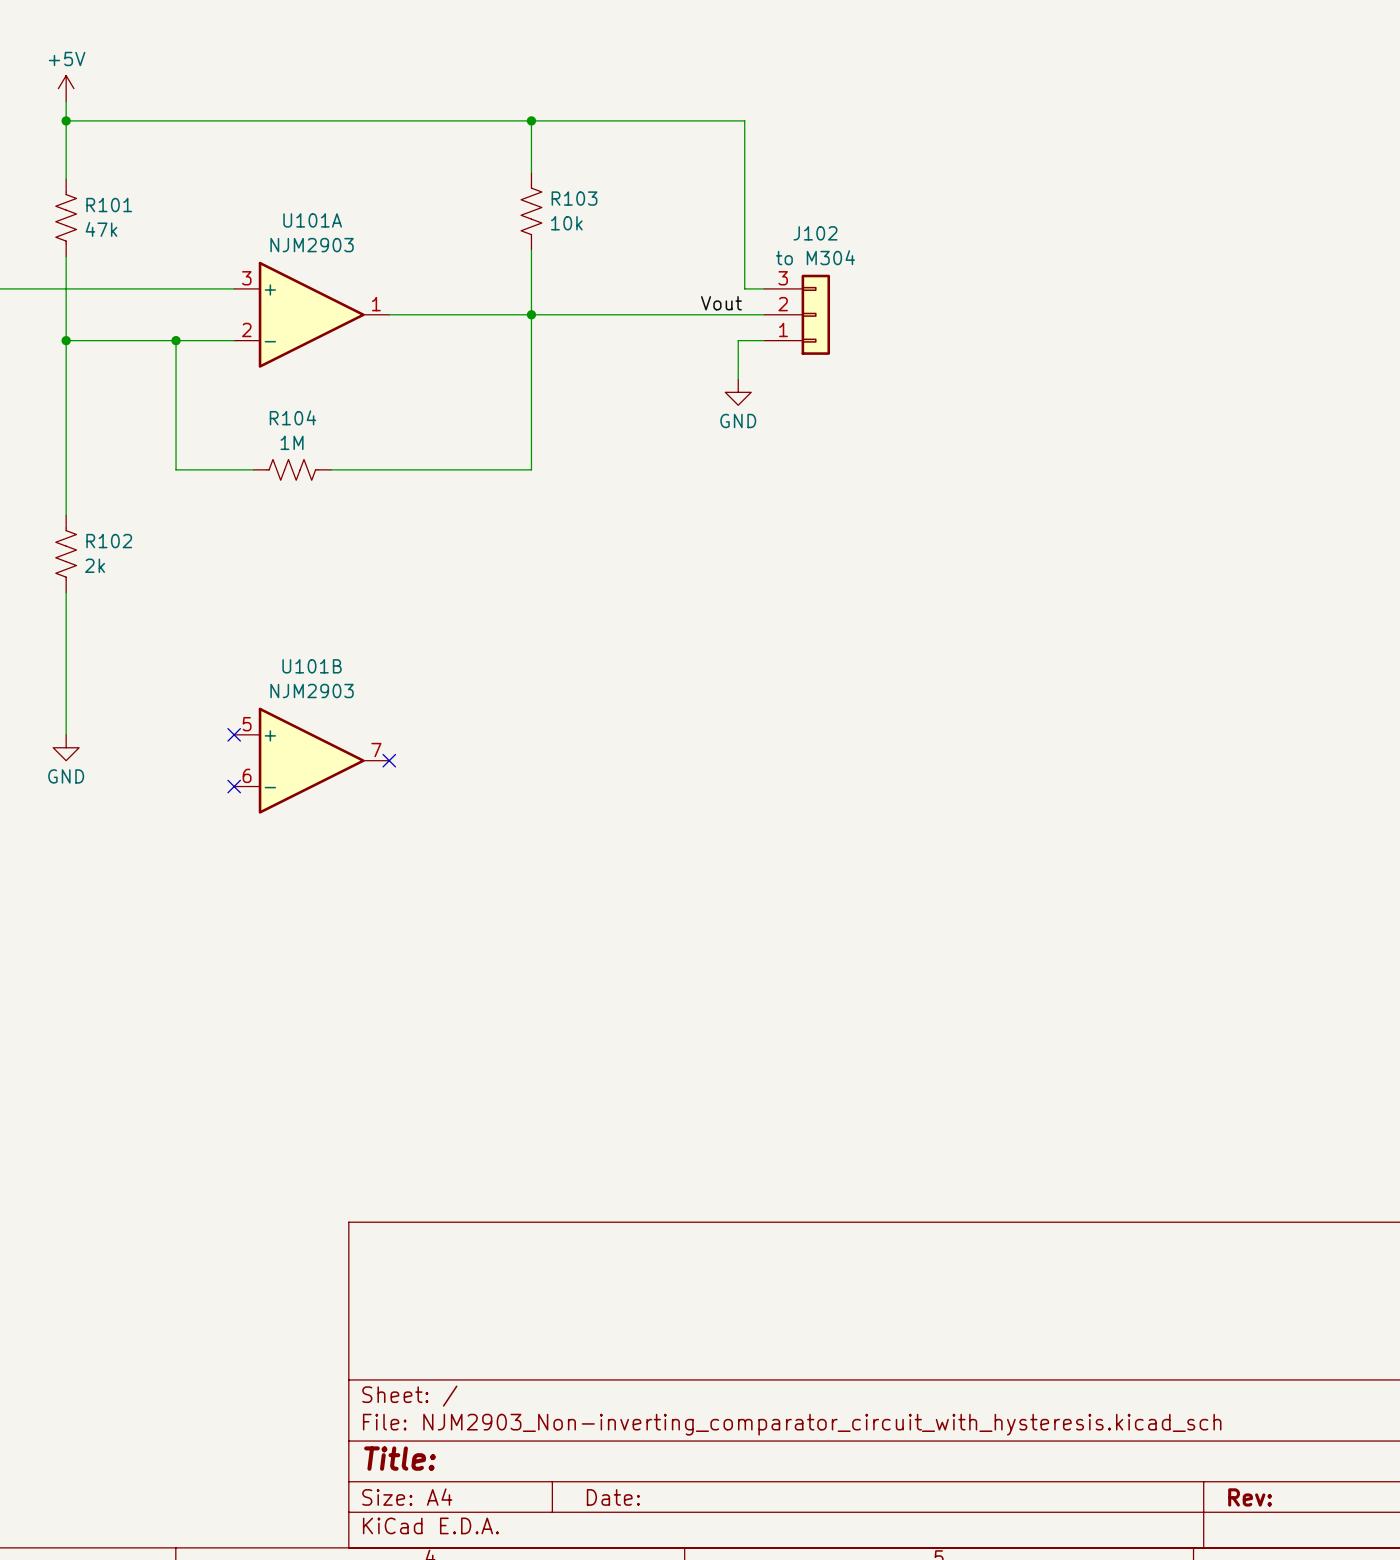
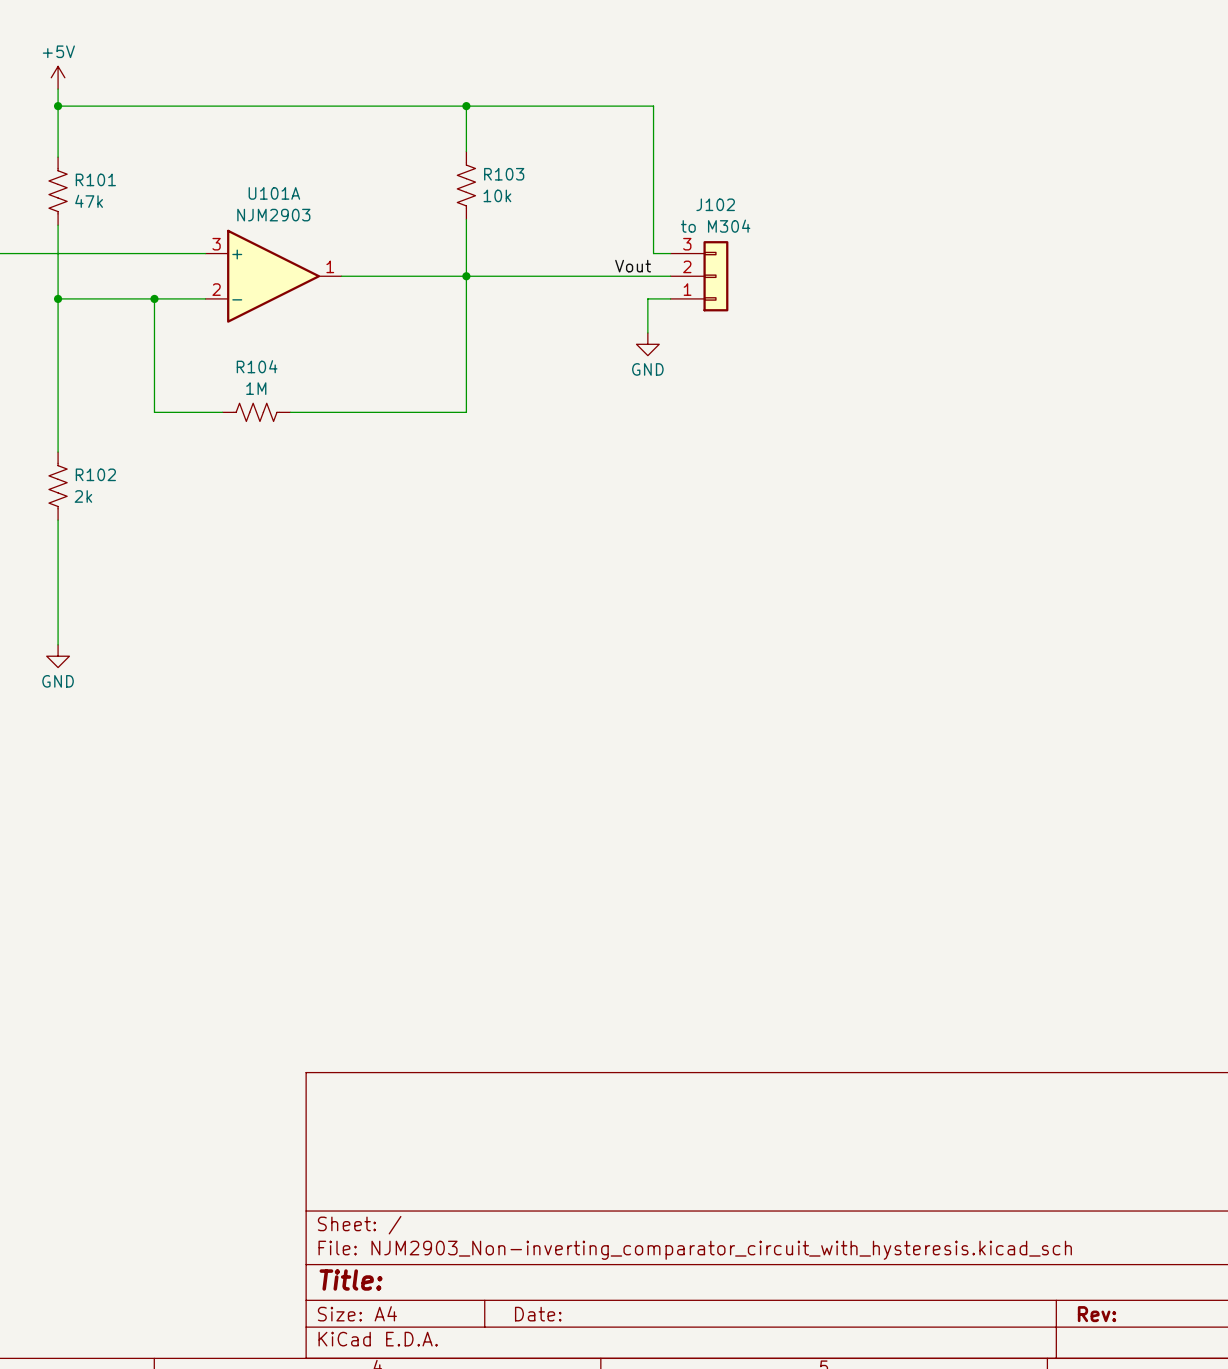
no-connect mark: (234, 734) -> none
U101B: NJM2903 (311, 760) -> none
no-connect mark: (389, 760) -> none
no-connect mark: (234, 786) -> none

